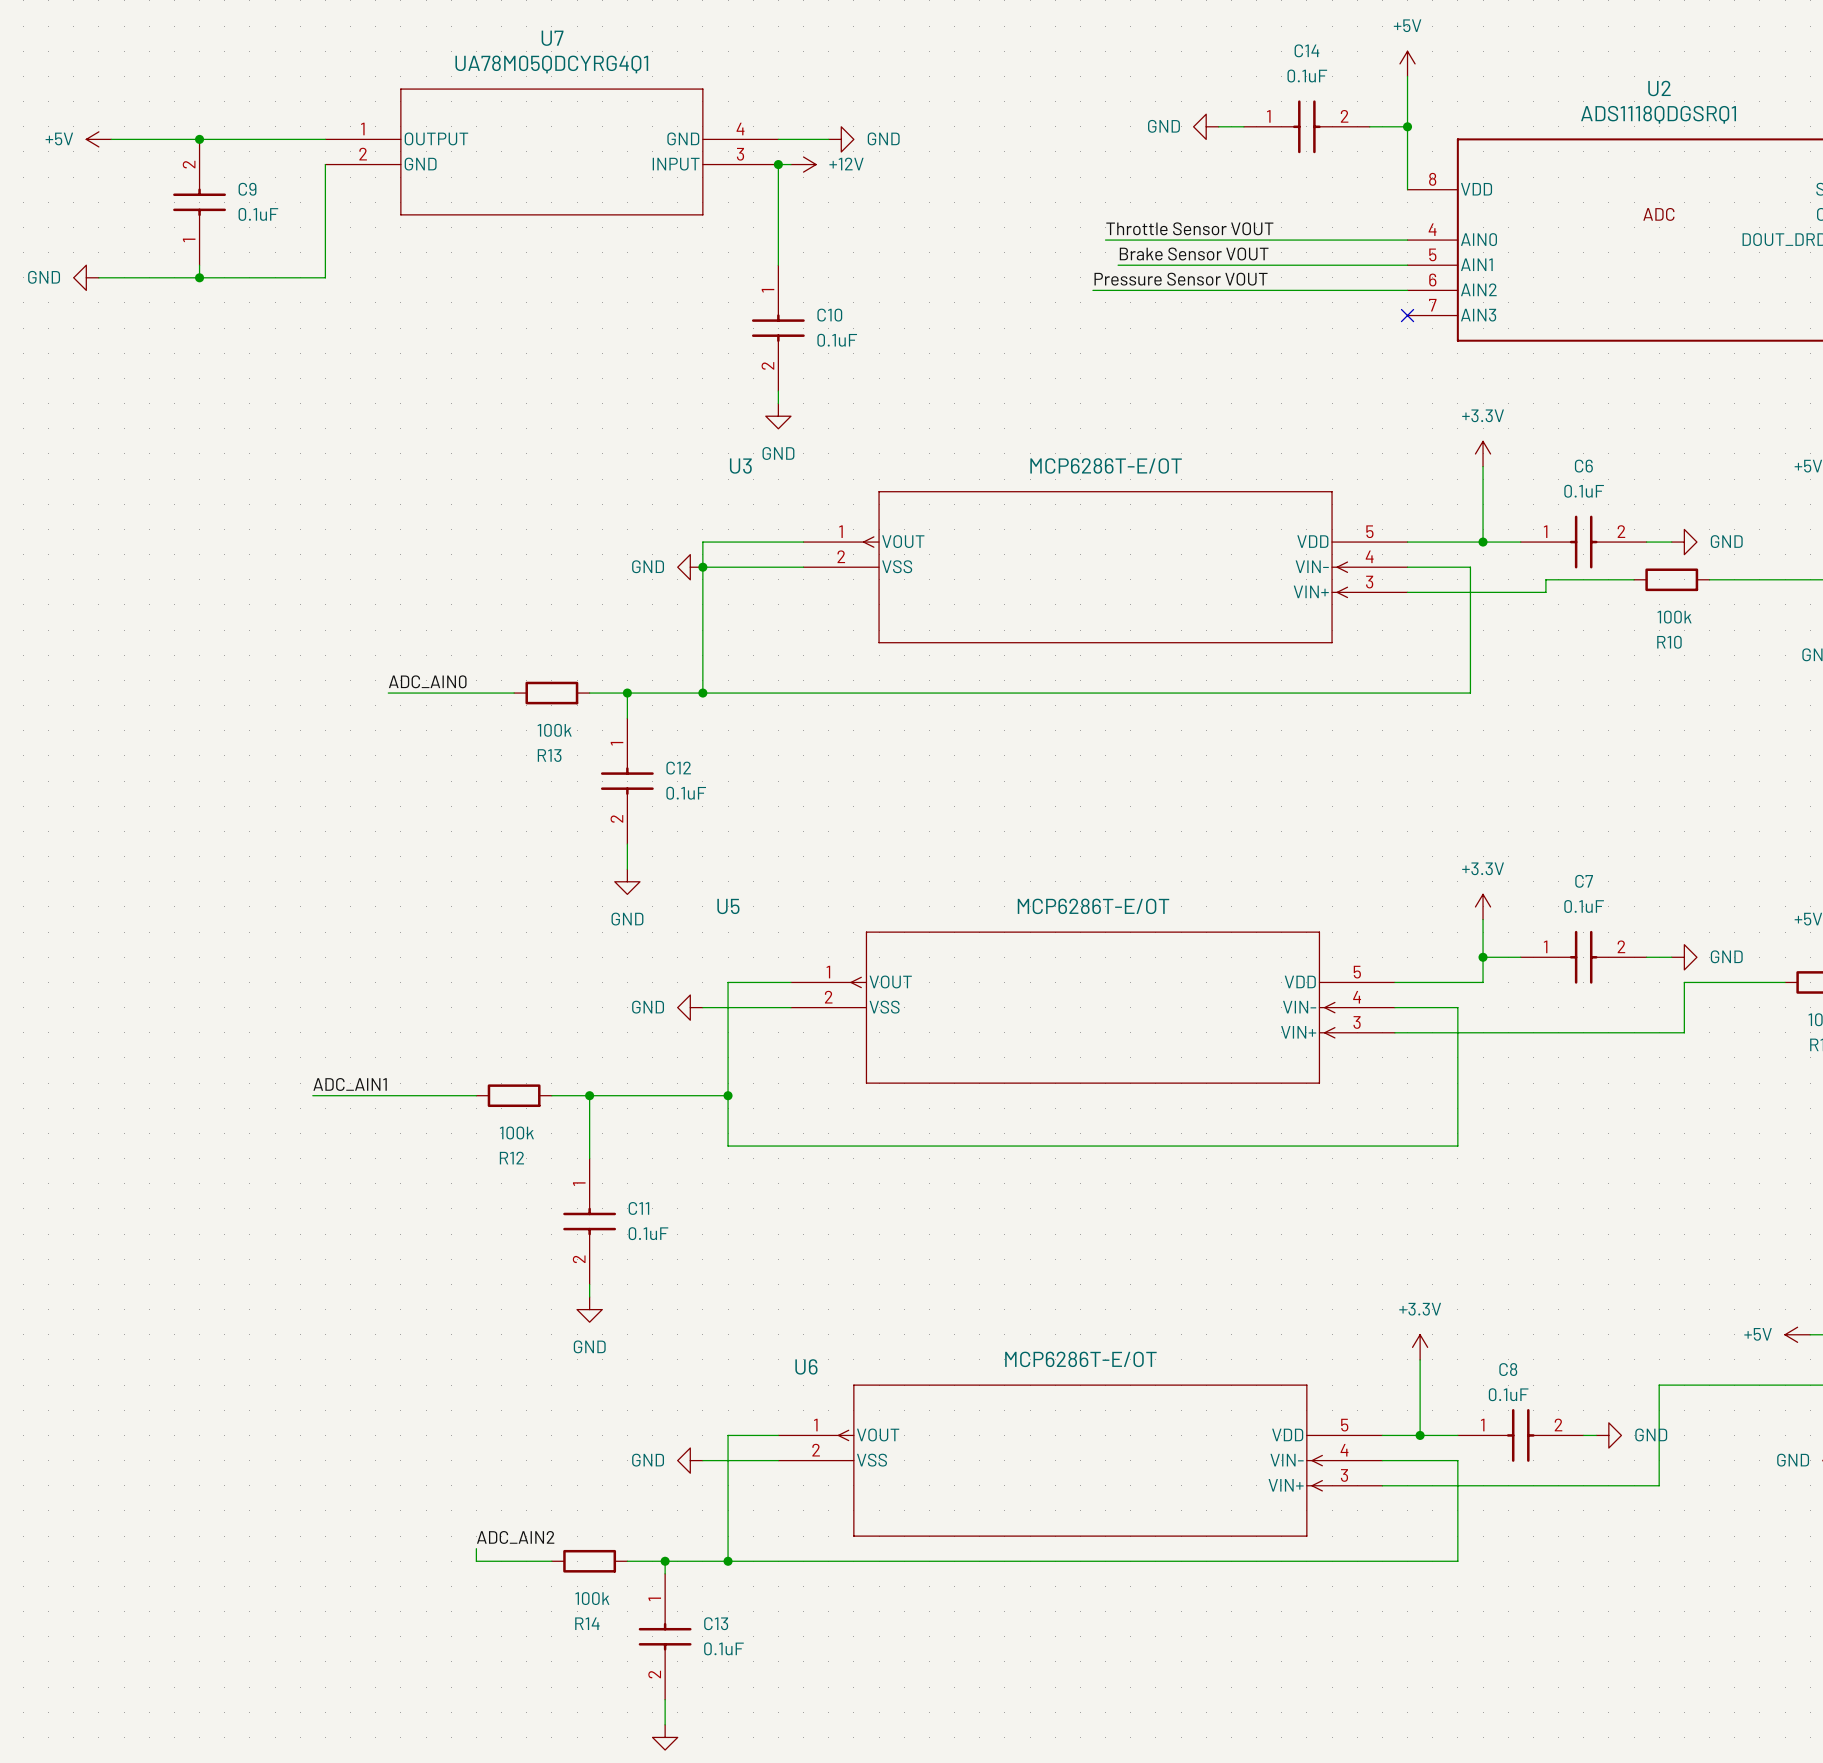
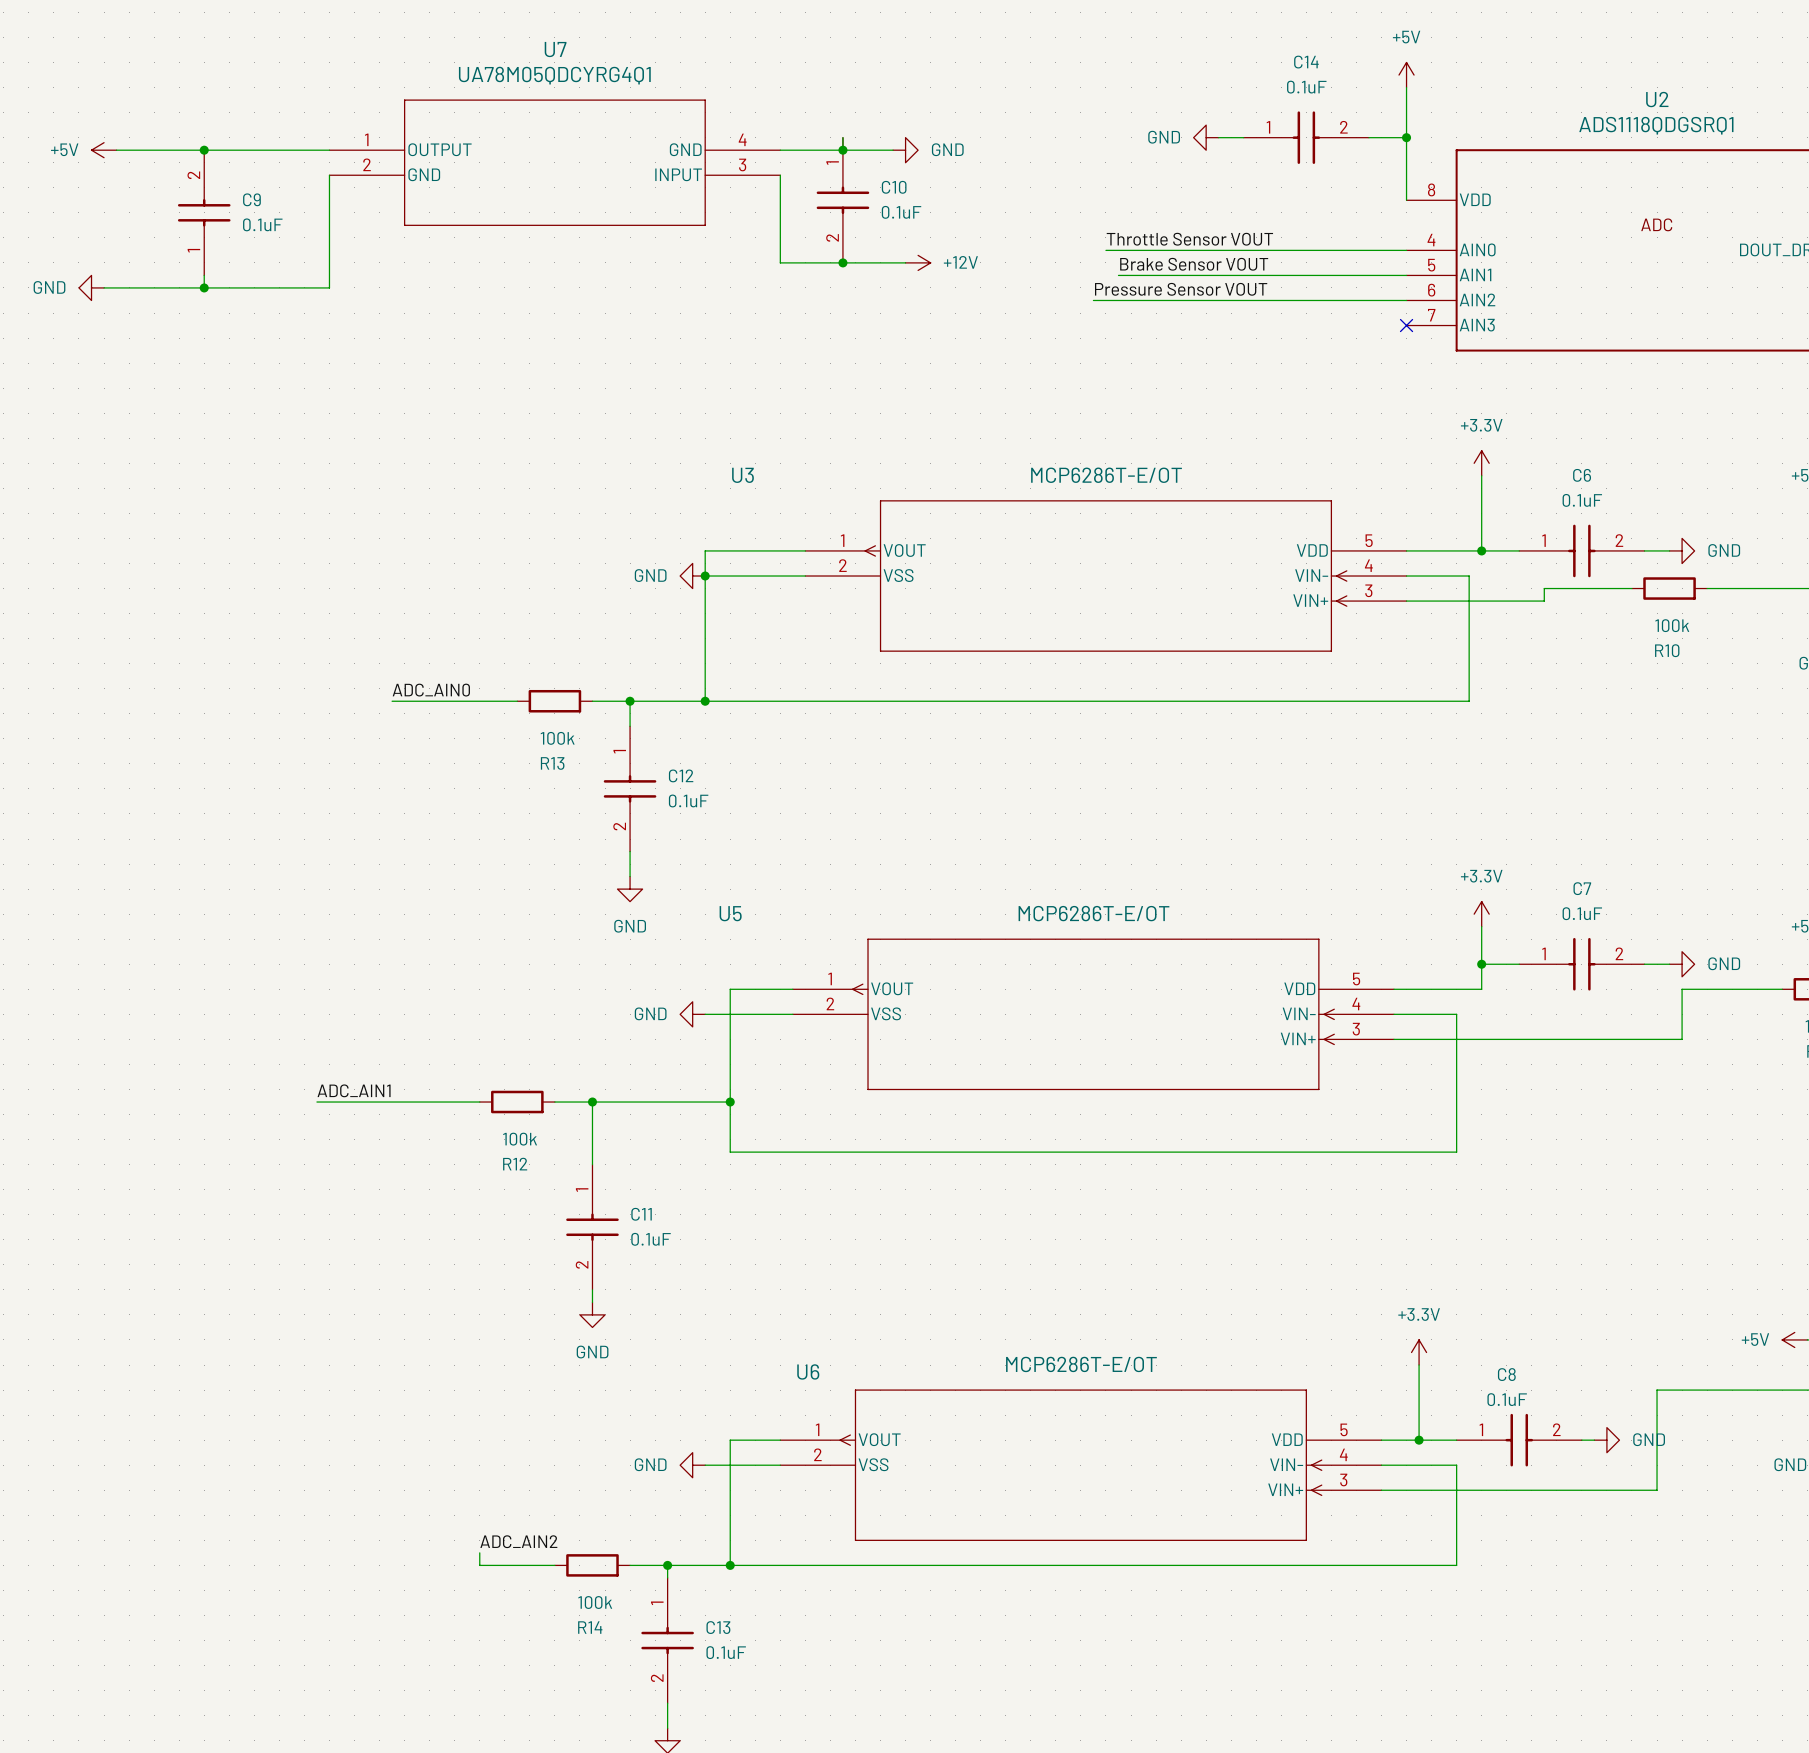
wire: none -> (830, 150) (893, 150)
junction: none -> (842, 150)
power symbol position: GND (841, 139) -> GND (905, 150)
wire: (778, 164) (790, 164) -> none
junction: (778, 164) -> none
power symbol position: +12V (803, 164) -> +12V (918, 262)
wire: (778, 252) (778, 265) -> (780, 262) (905, 262)
junction: none -> (842, 262)
C10 position: (778, 328) -> (842, 200)
wire: (778, 391) (778, 403) -> none
power symbol: GND (778, 416) -> none

